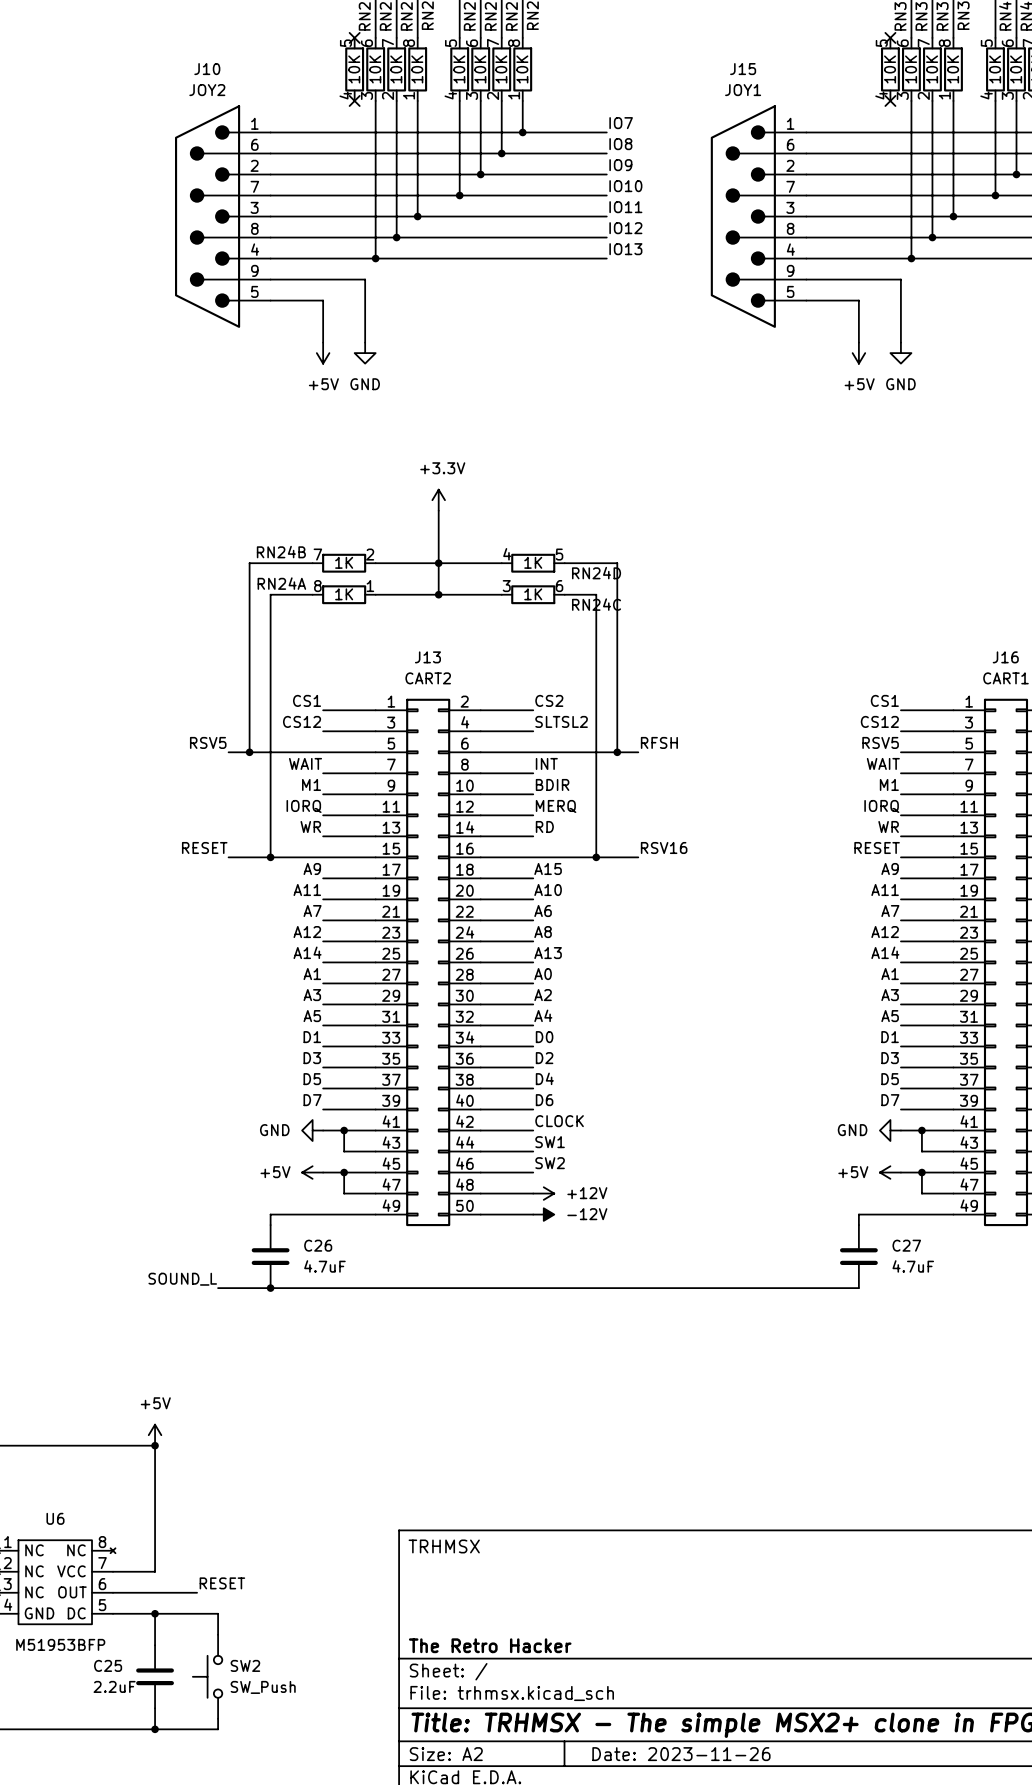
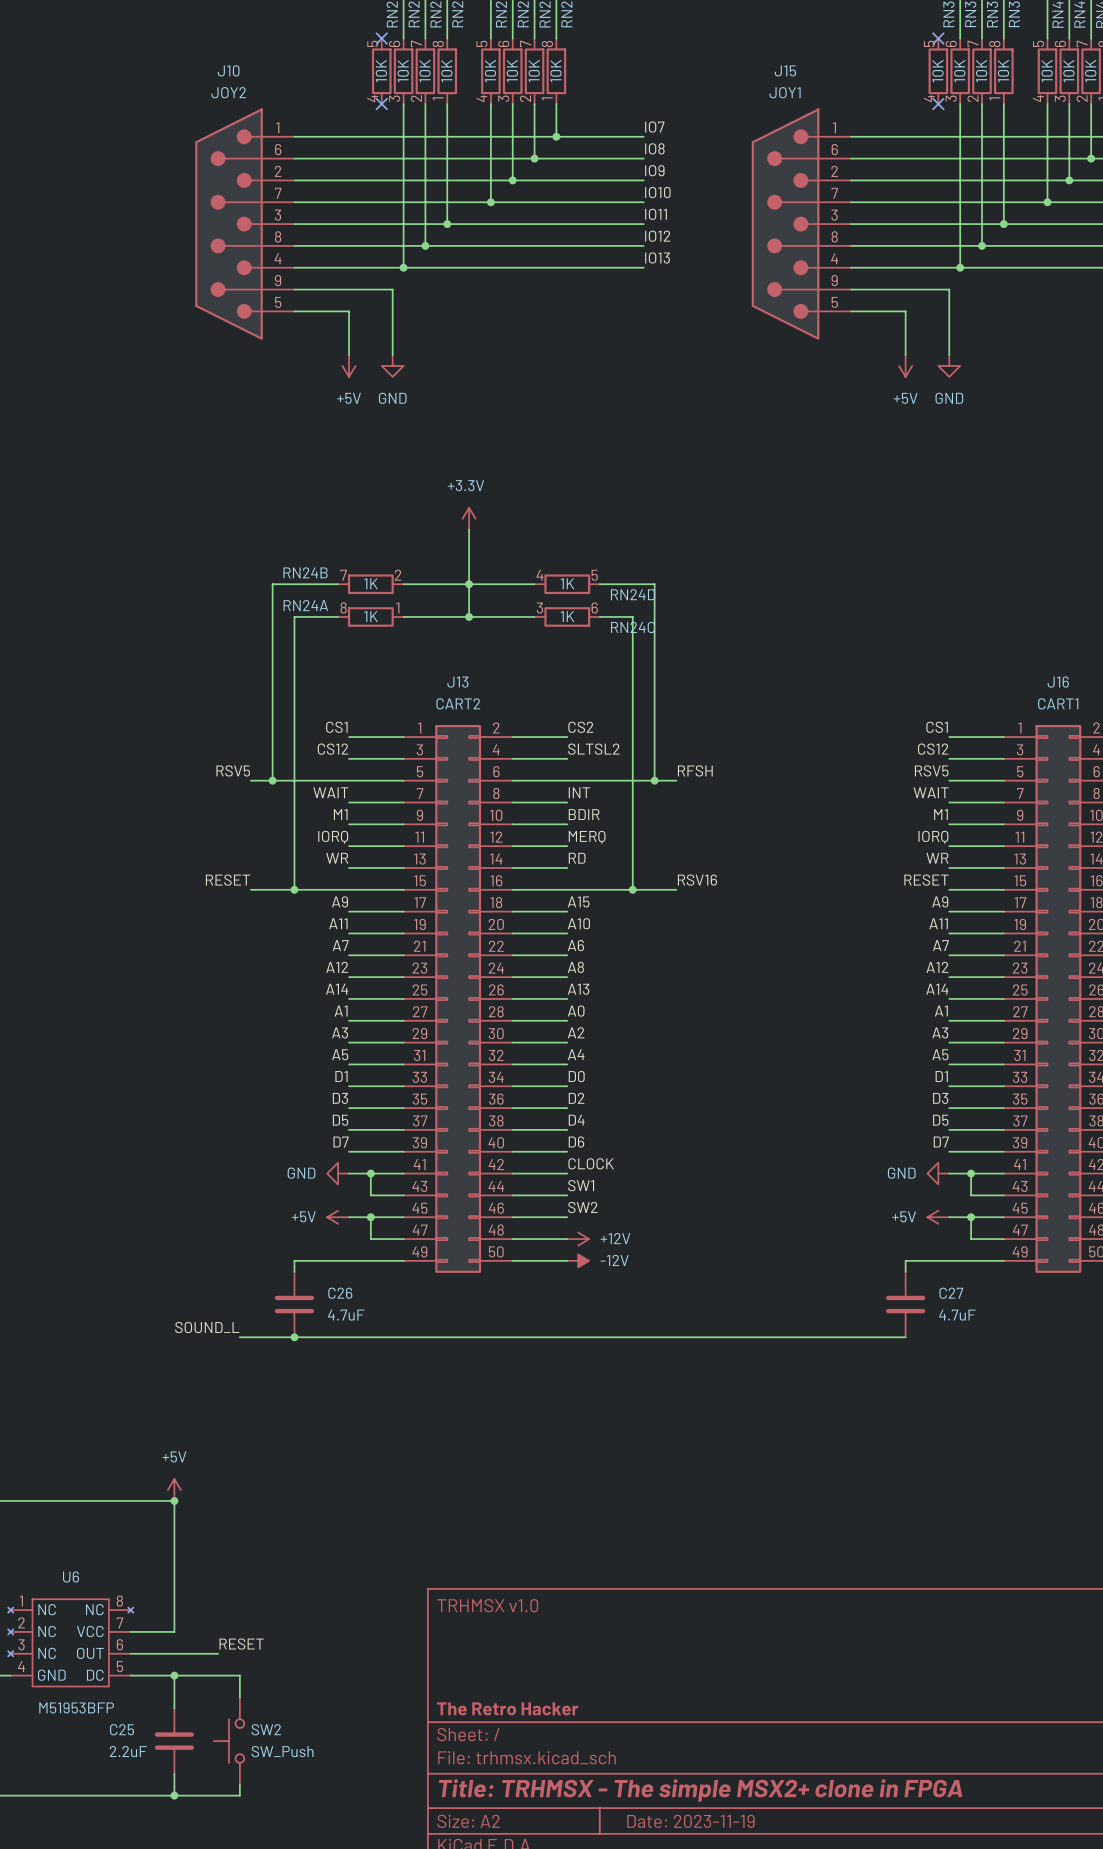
title block: TRHMSX (444, 1546) -> TRHMSX v1.0 (487, 1605)
title block: Date: 2023-11-26 (681, 1754) -> Date: 2023-11-19 (690, 1821)

